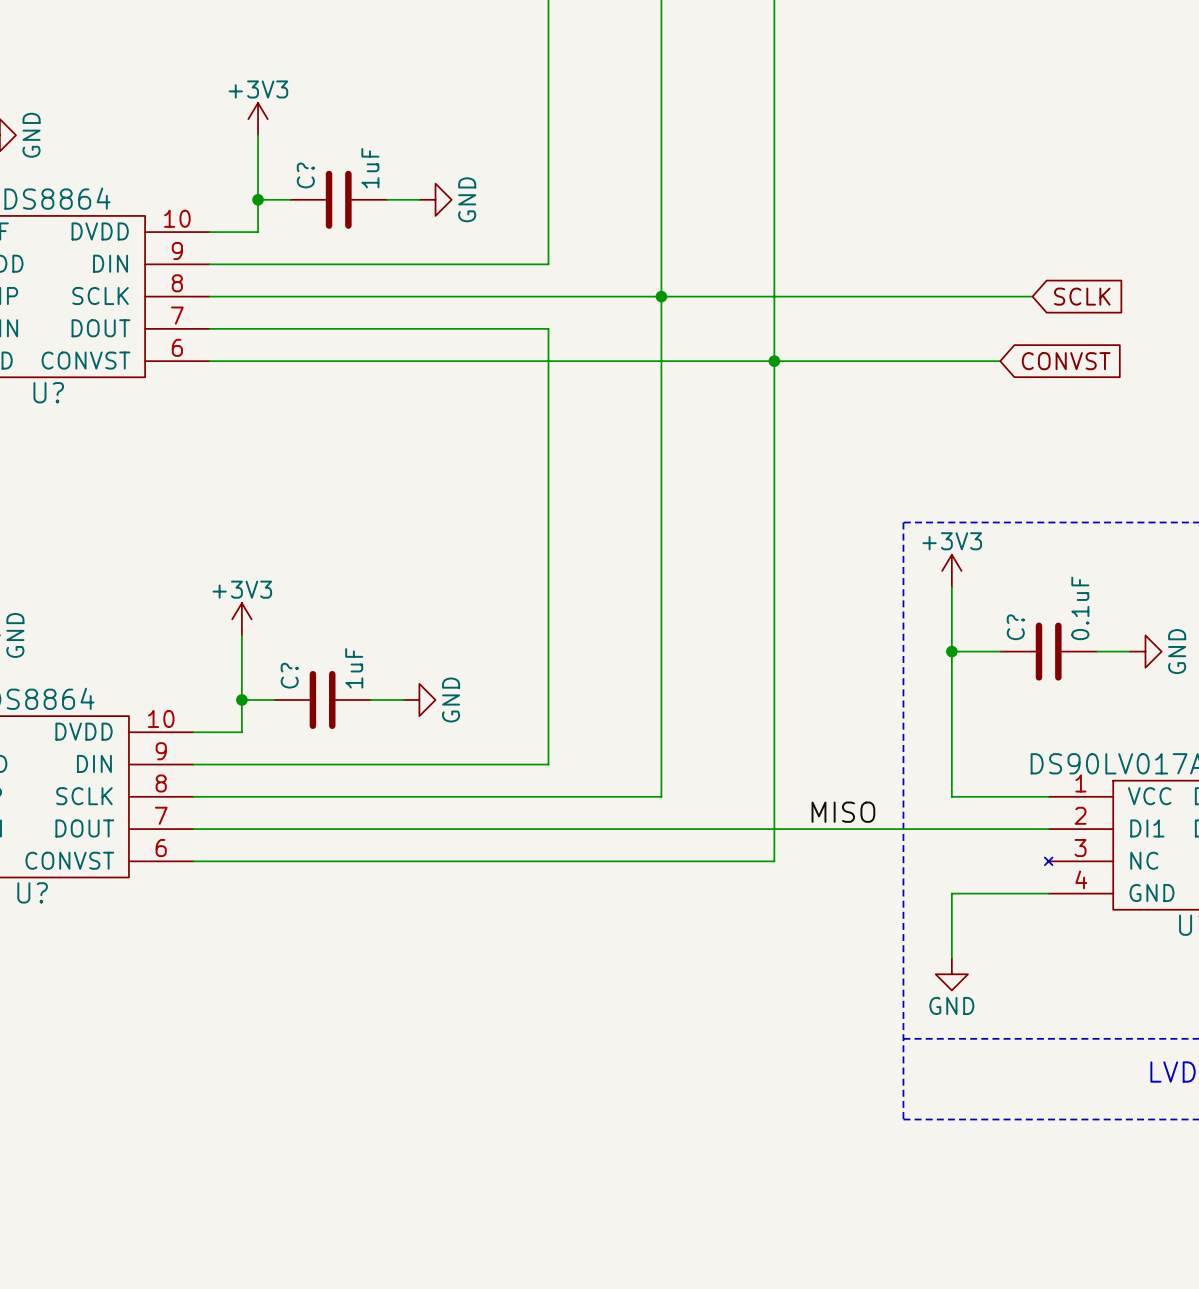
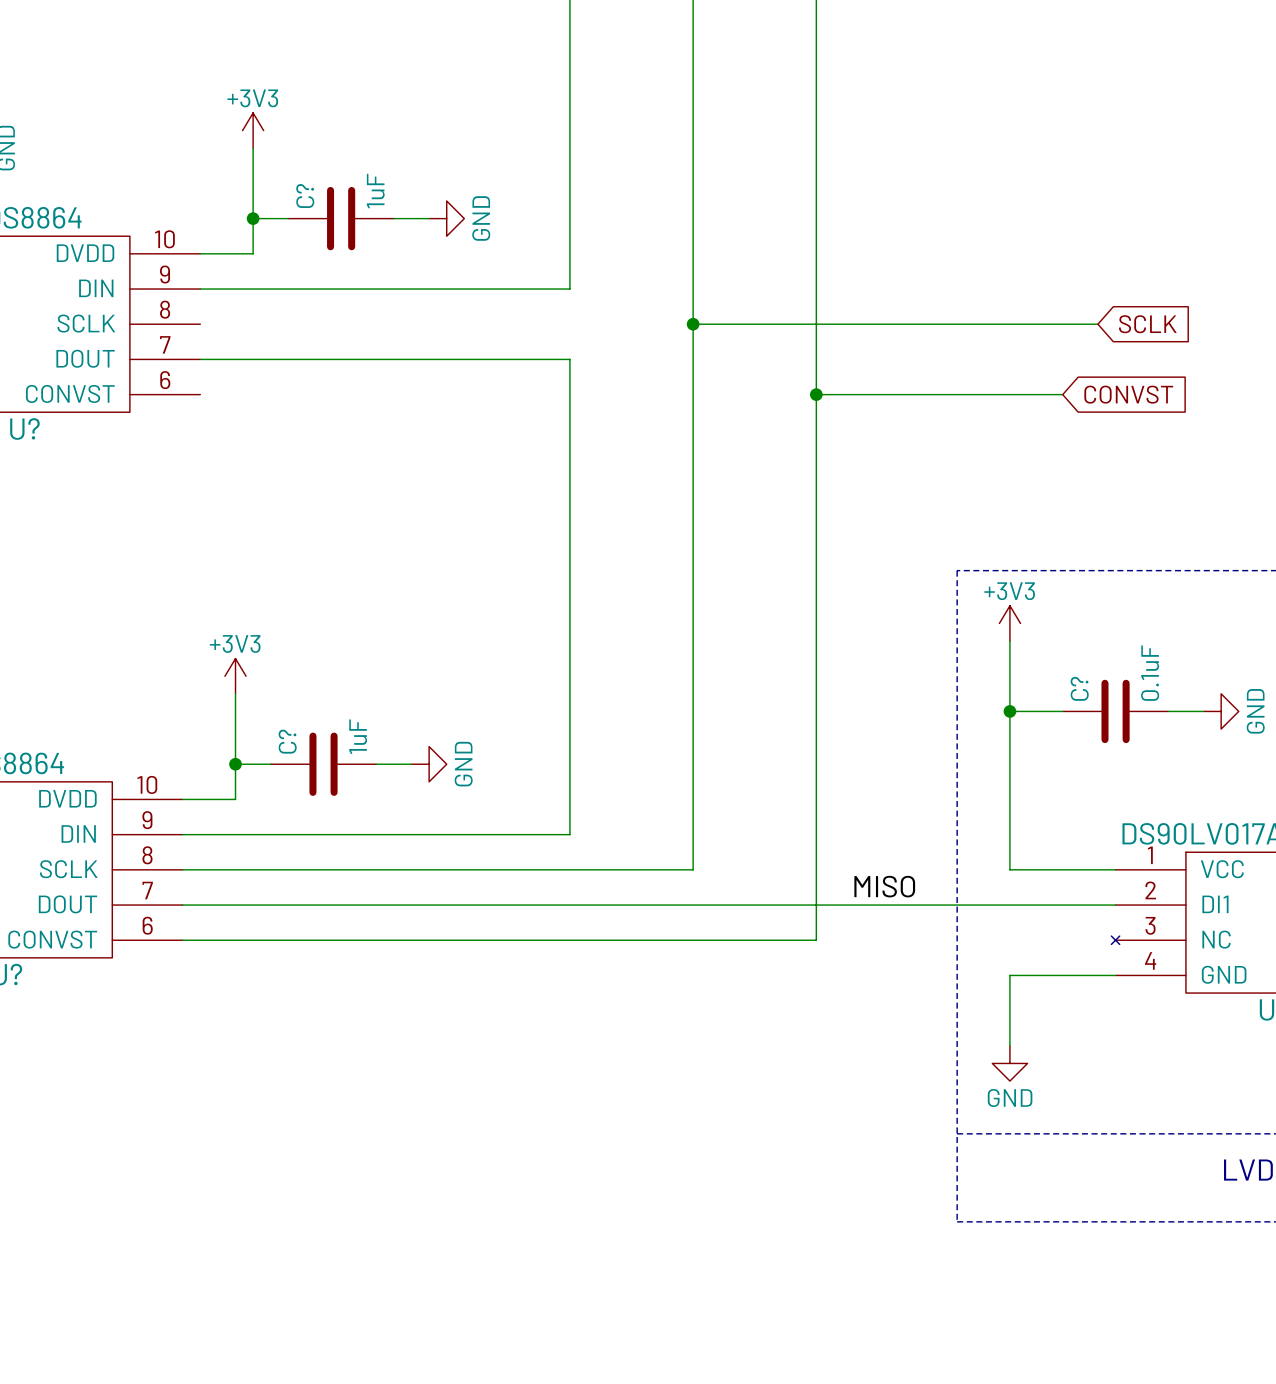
wire: (209, 296) (661, 296) -> none
wire: (209, 361) (774, 361) -> none

